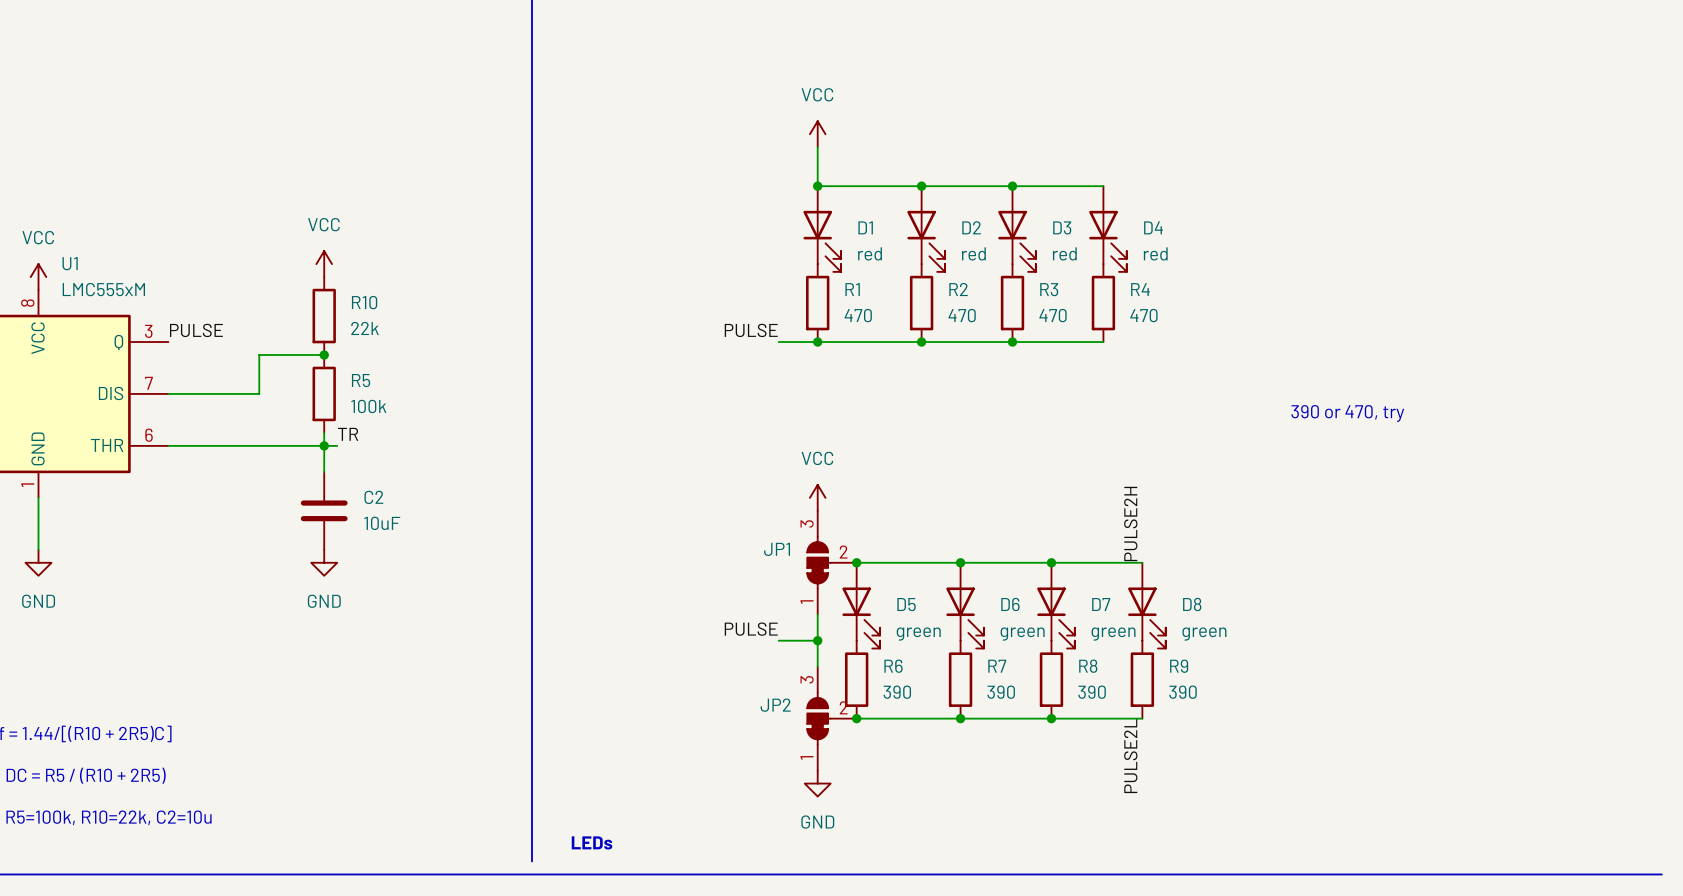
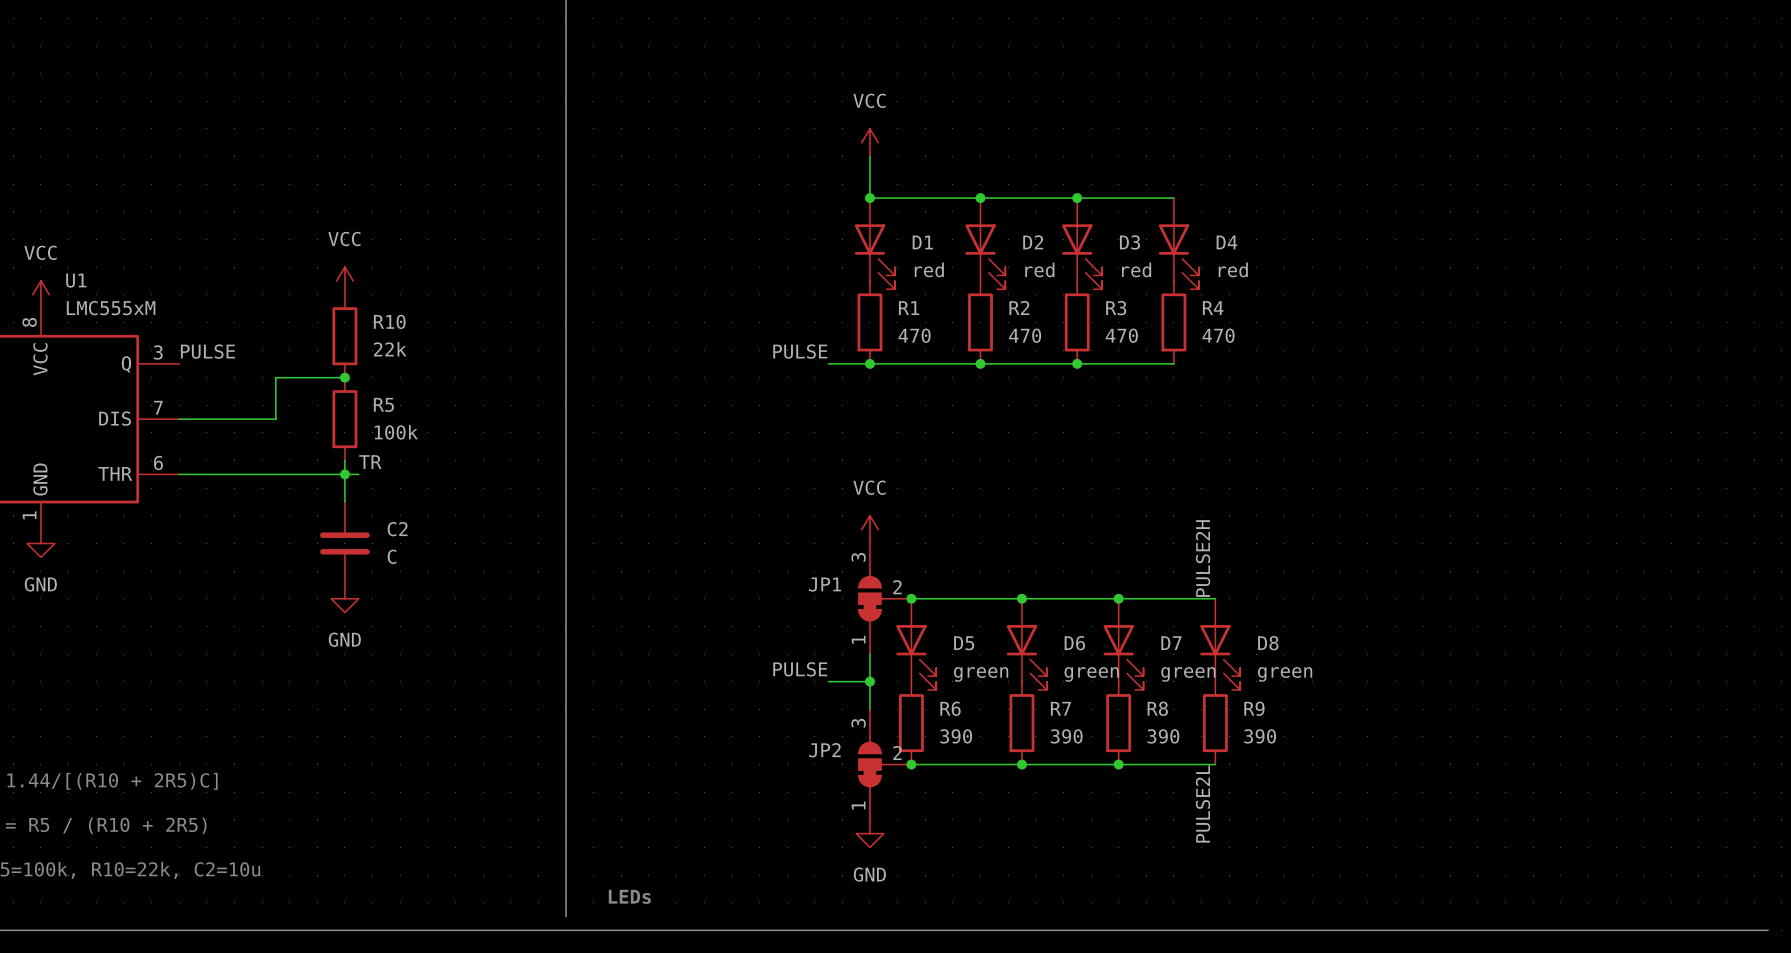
text: 390 or 470, try (1347, 413) -> none
wire: (38, 497) (38, 549) -> none
C2 value: 10uF (382, 523) -> C (391, 556)
power symbol position: GND (38, 562) -> GND (40, 543)

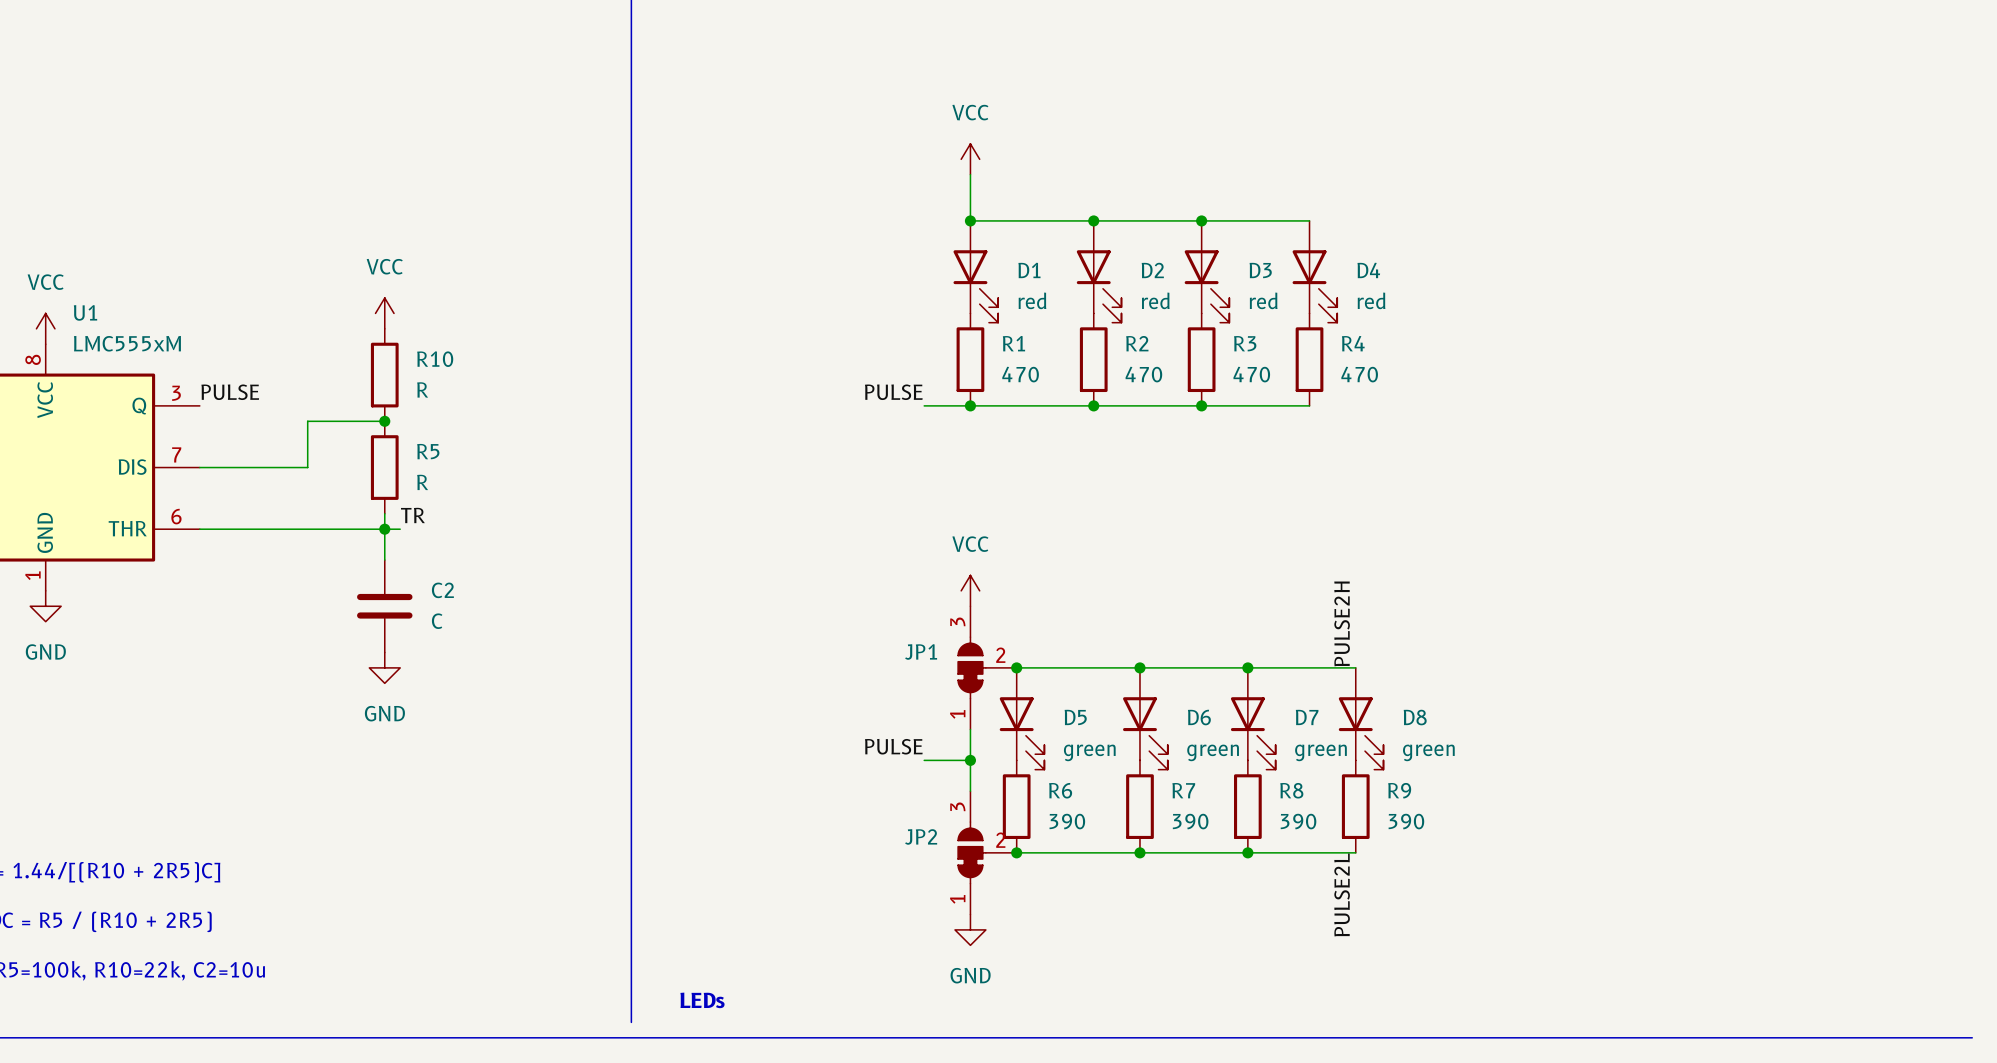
R10 value: 22k (390, 349) -> R (422, 389)
R5 value: 100k (396, 432) -> R (422, 482)

